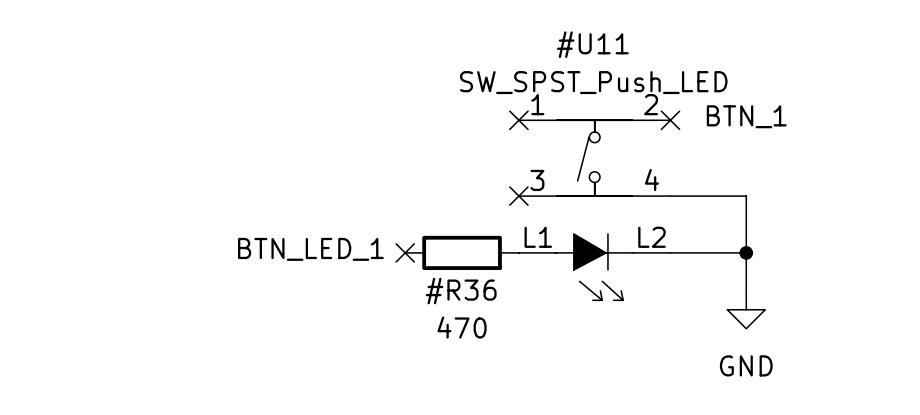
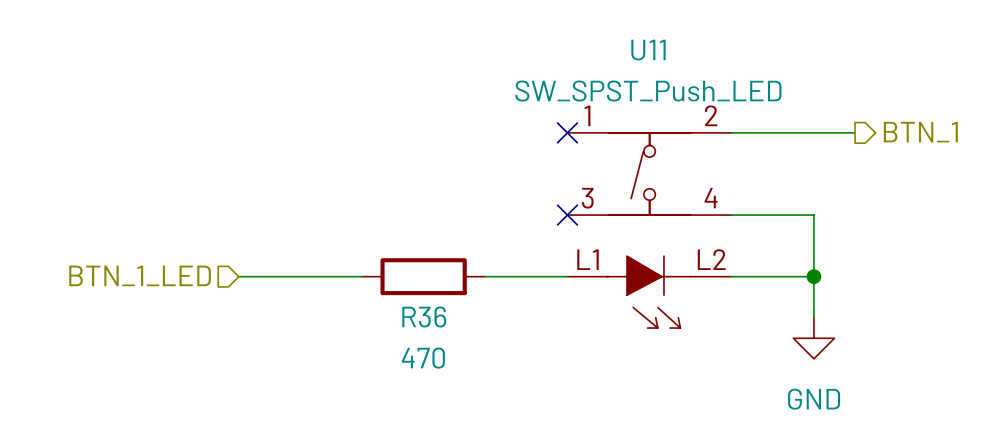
text: BTN_1 (746, 116) -> none
wire: none -> (731, 132) (855, 132)
no-connect mark: (670, 120) -> none
hierarchical label: none -> BTN_1 (920, 132)
#U11: SW_SPST_Push_LED (594, 210) -> none
U11: none -> SW_SPST_Push_LED (649, 230)
text: BTN_LED_1 (310, 249) -> none
wire: none -> (238, 276) (362, 276)
R36: none -> 470 (423, 276)
no-connect mark: (405, 252) -> none
wire: none -> (485, 276) (567, 276)
#R36: 470 (462, 252) -> none
hierarchical label: none -> BTN_1_LED (140, 275)

